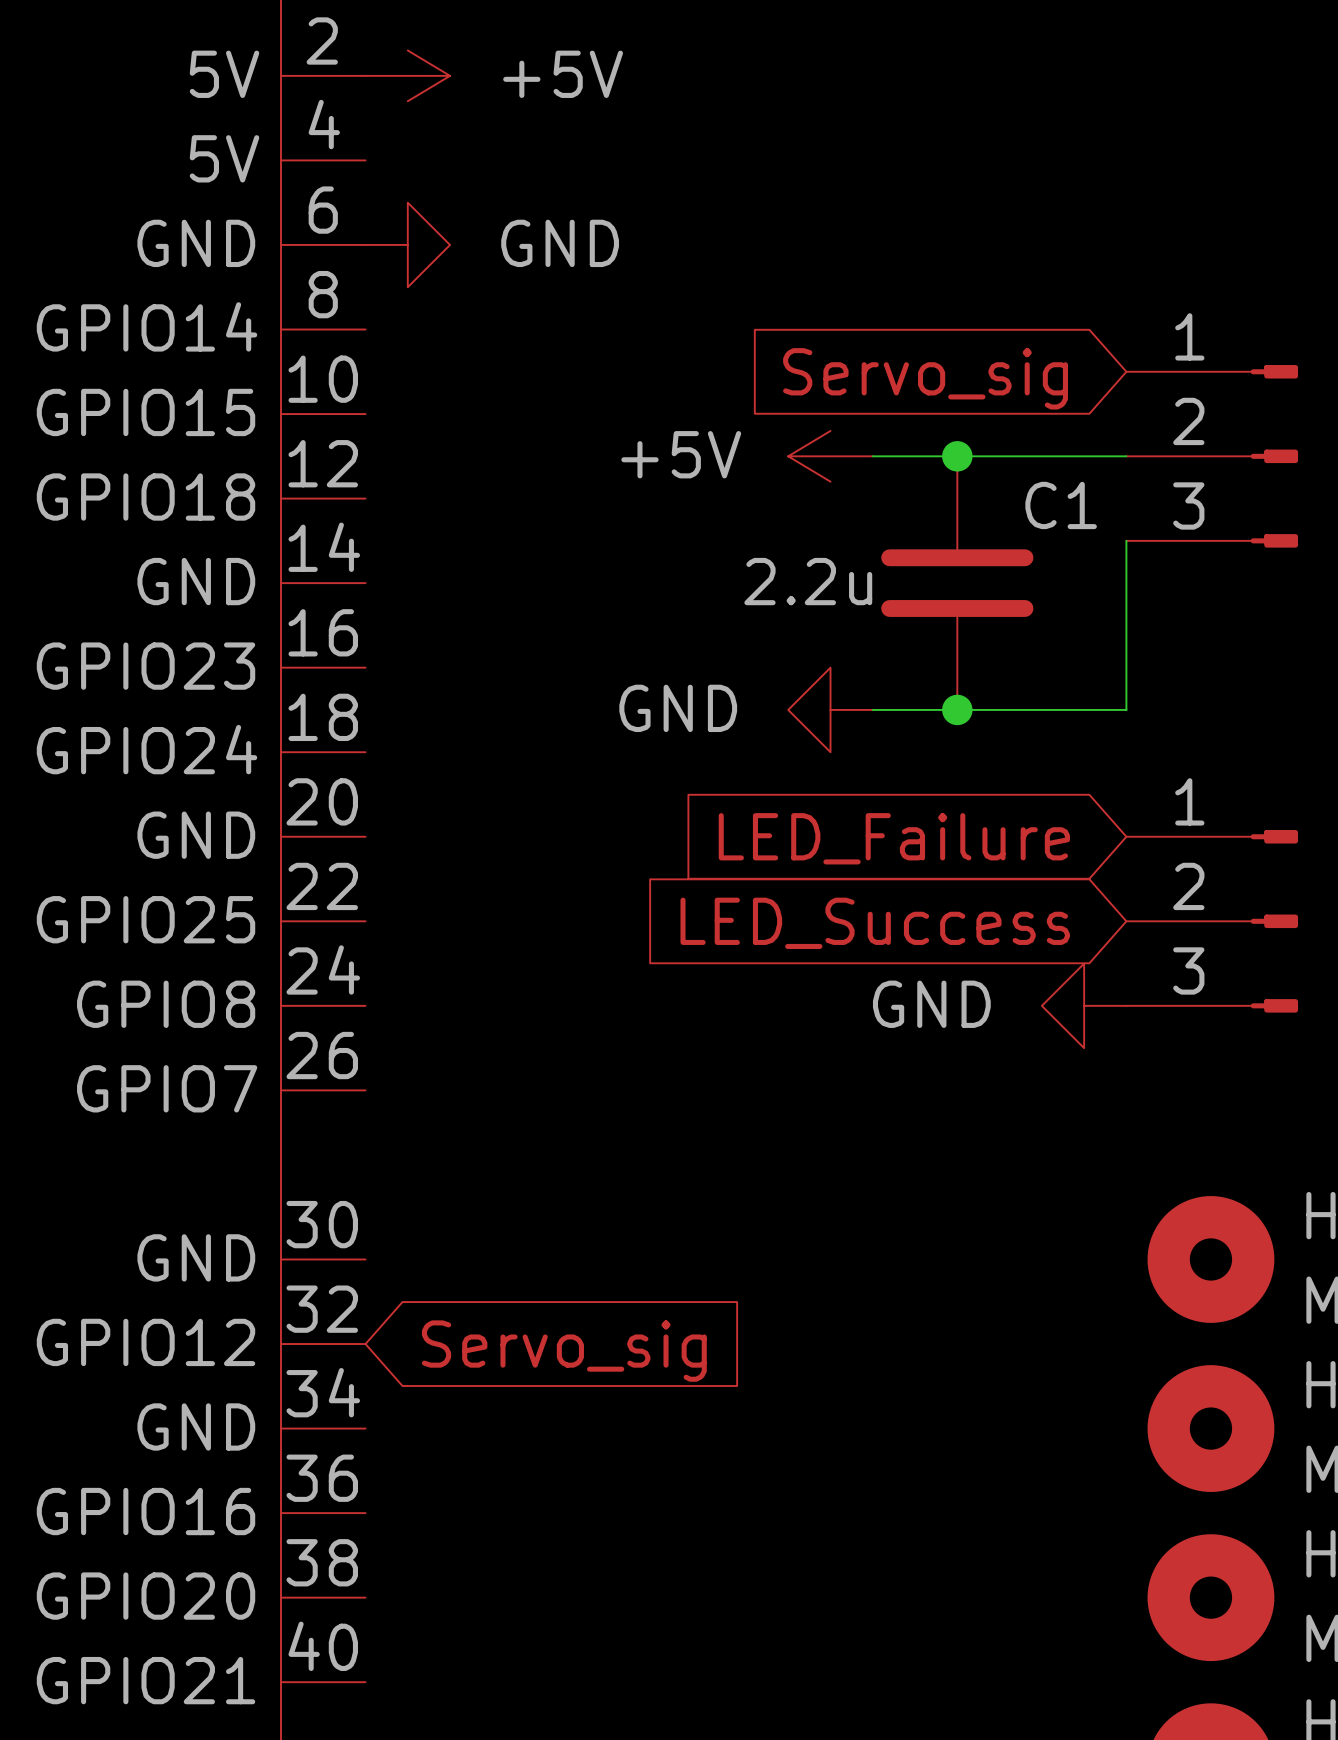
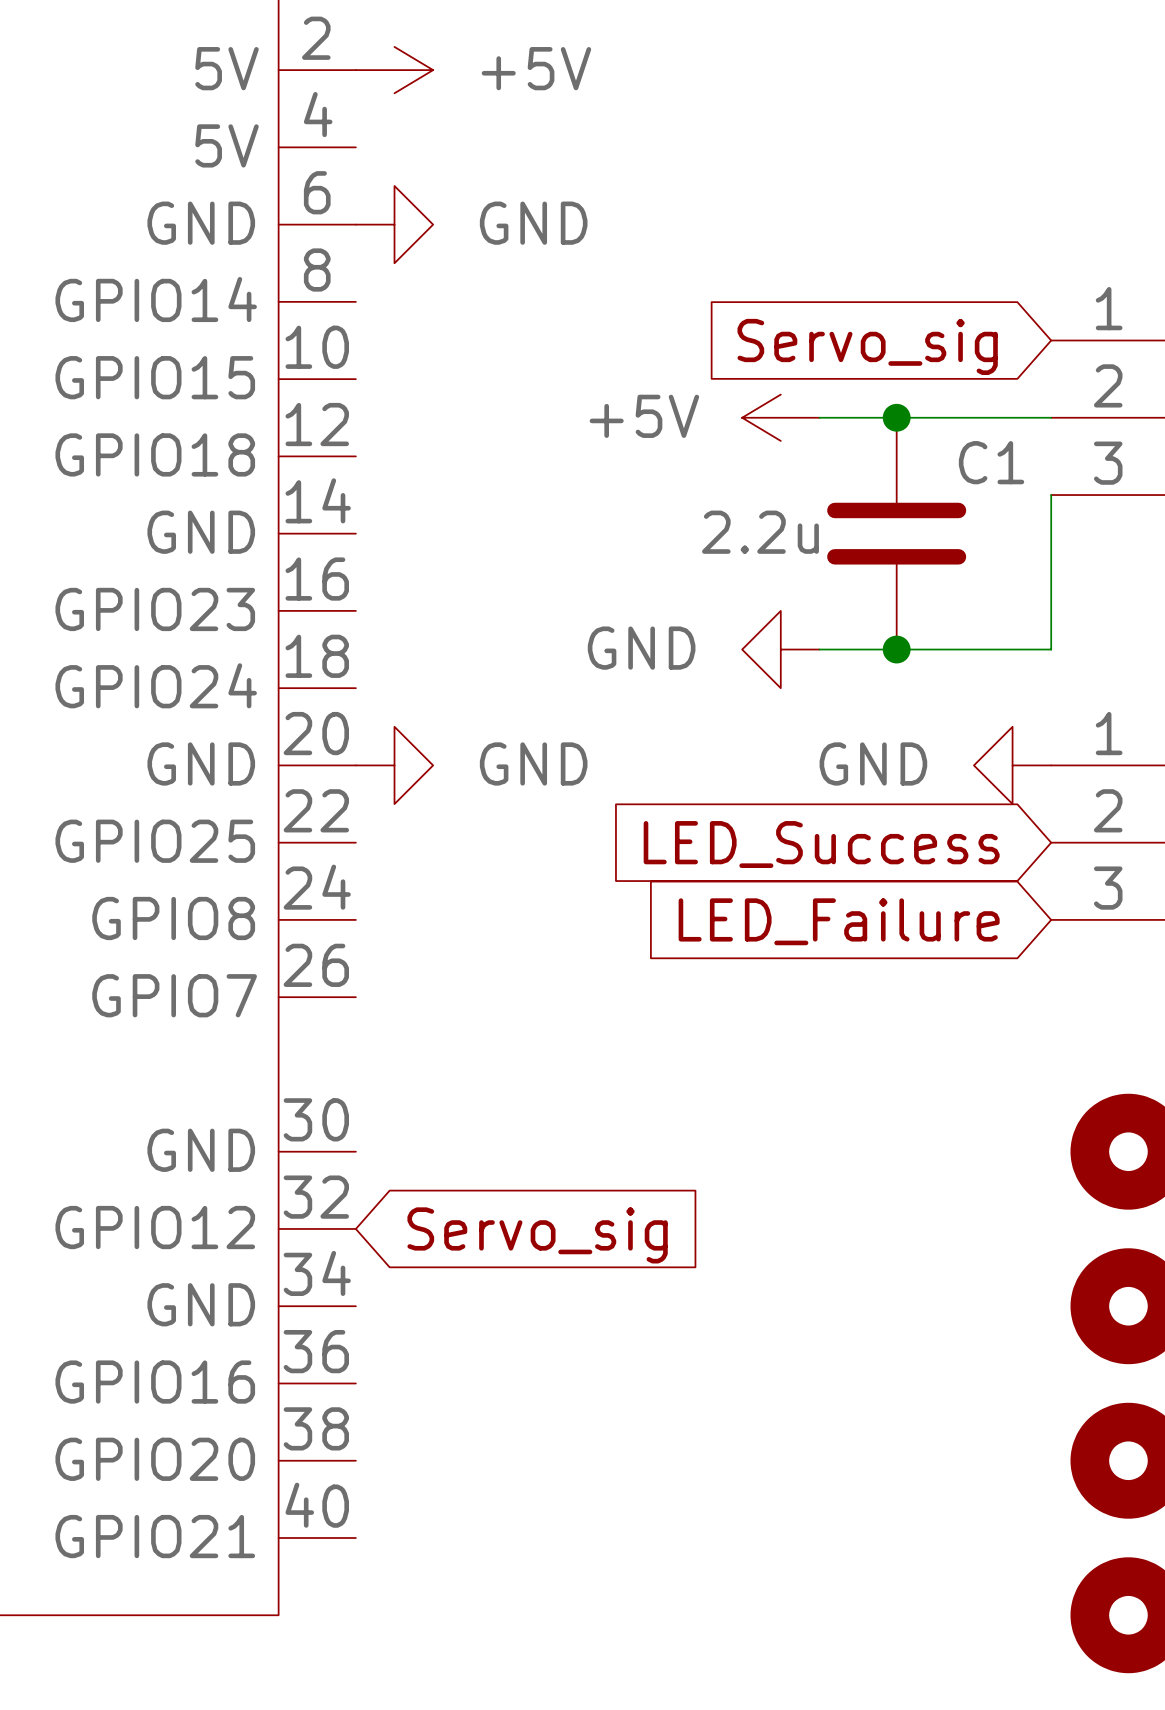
power symbol: none -> GND (394, 765)
global label position: LED_Failure (894, 838) -> LED_Failure (839, 921)
power symbol position: GND (1084, 1005) -> GND (1012, 765)

